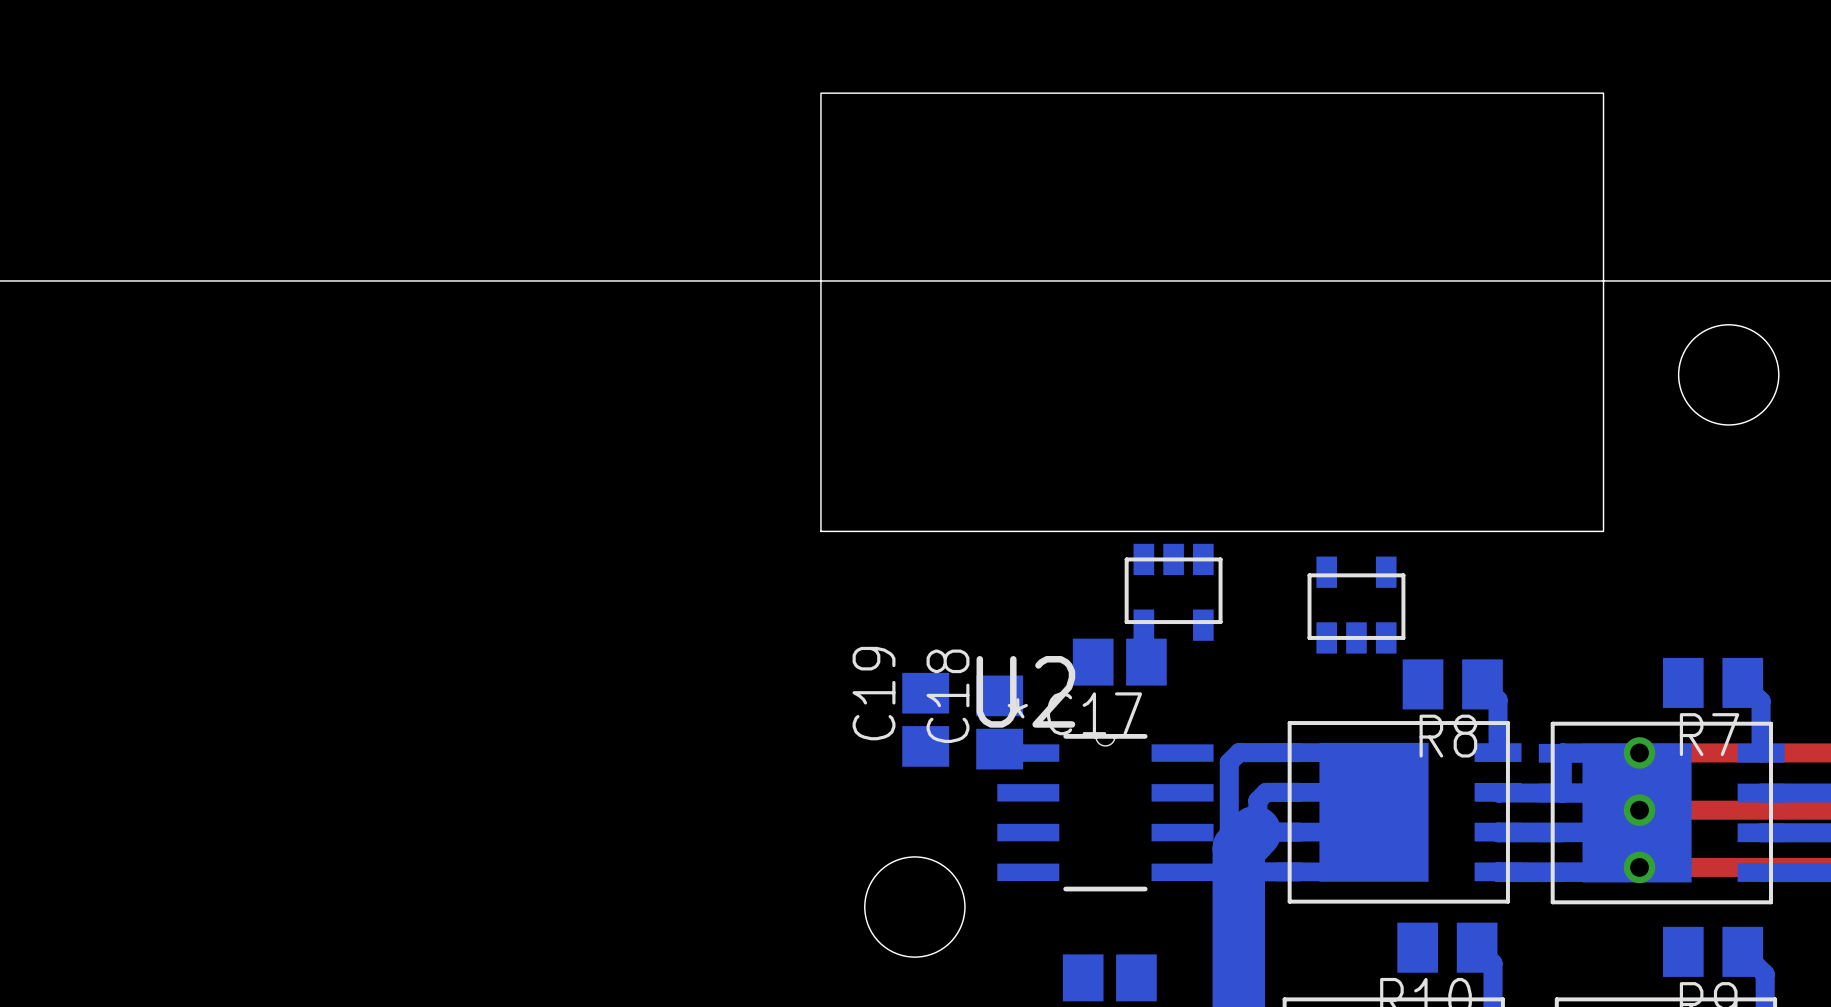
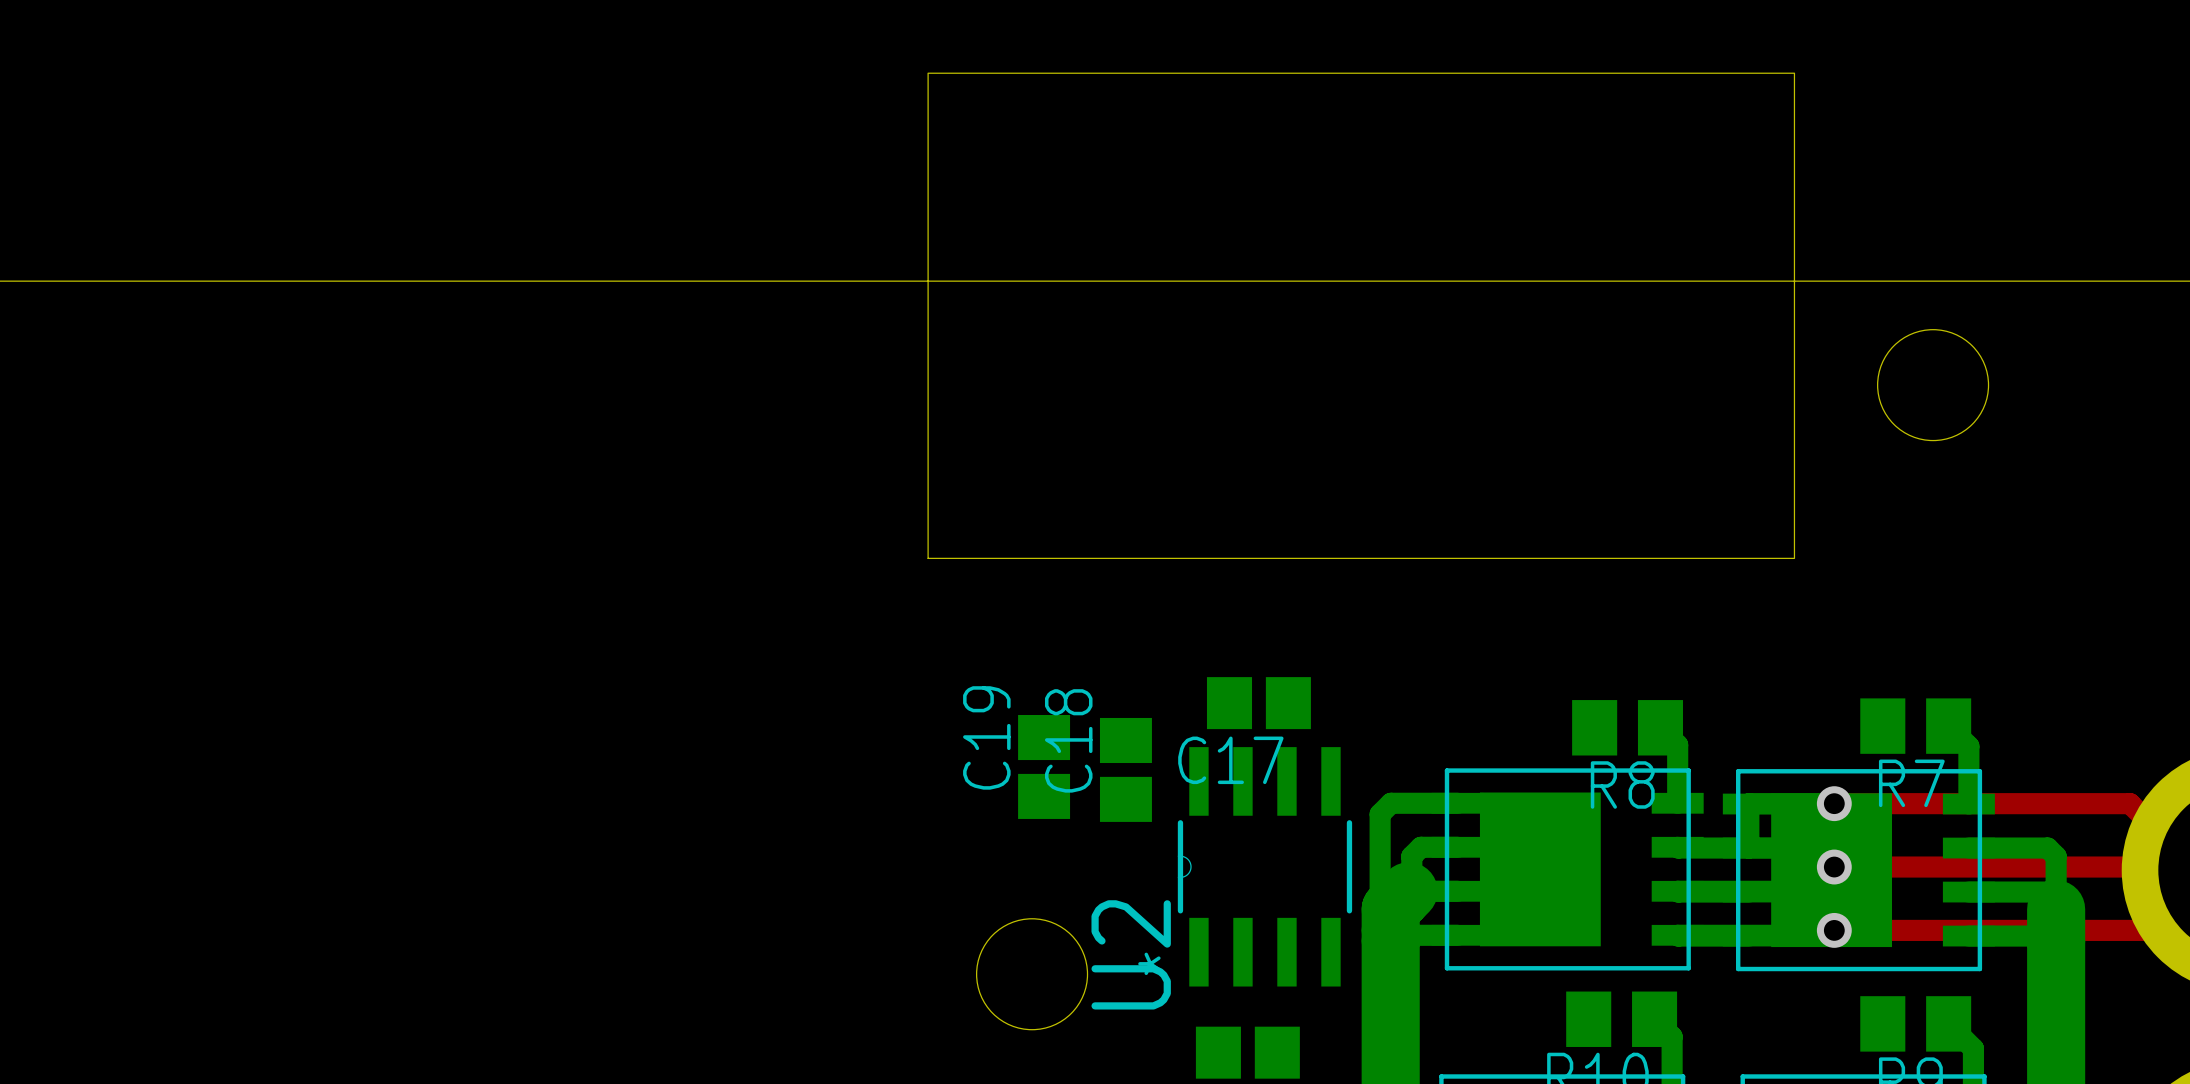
part: (1173, 592) -> none
part: (1356, 605) -> none
U2 rotation: 0° (1105, 812) -> 90° counterclockwise (1264, 866)

